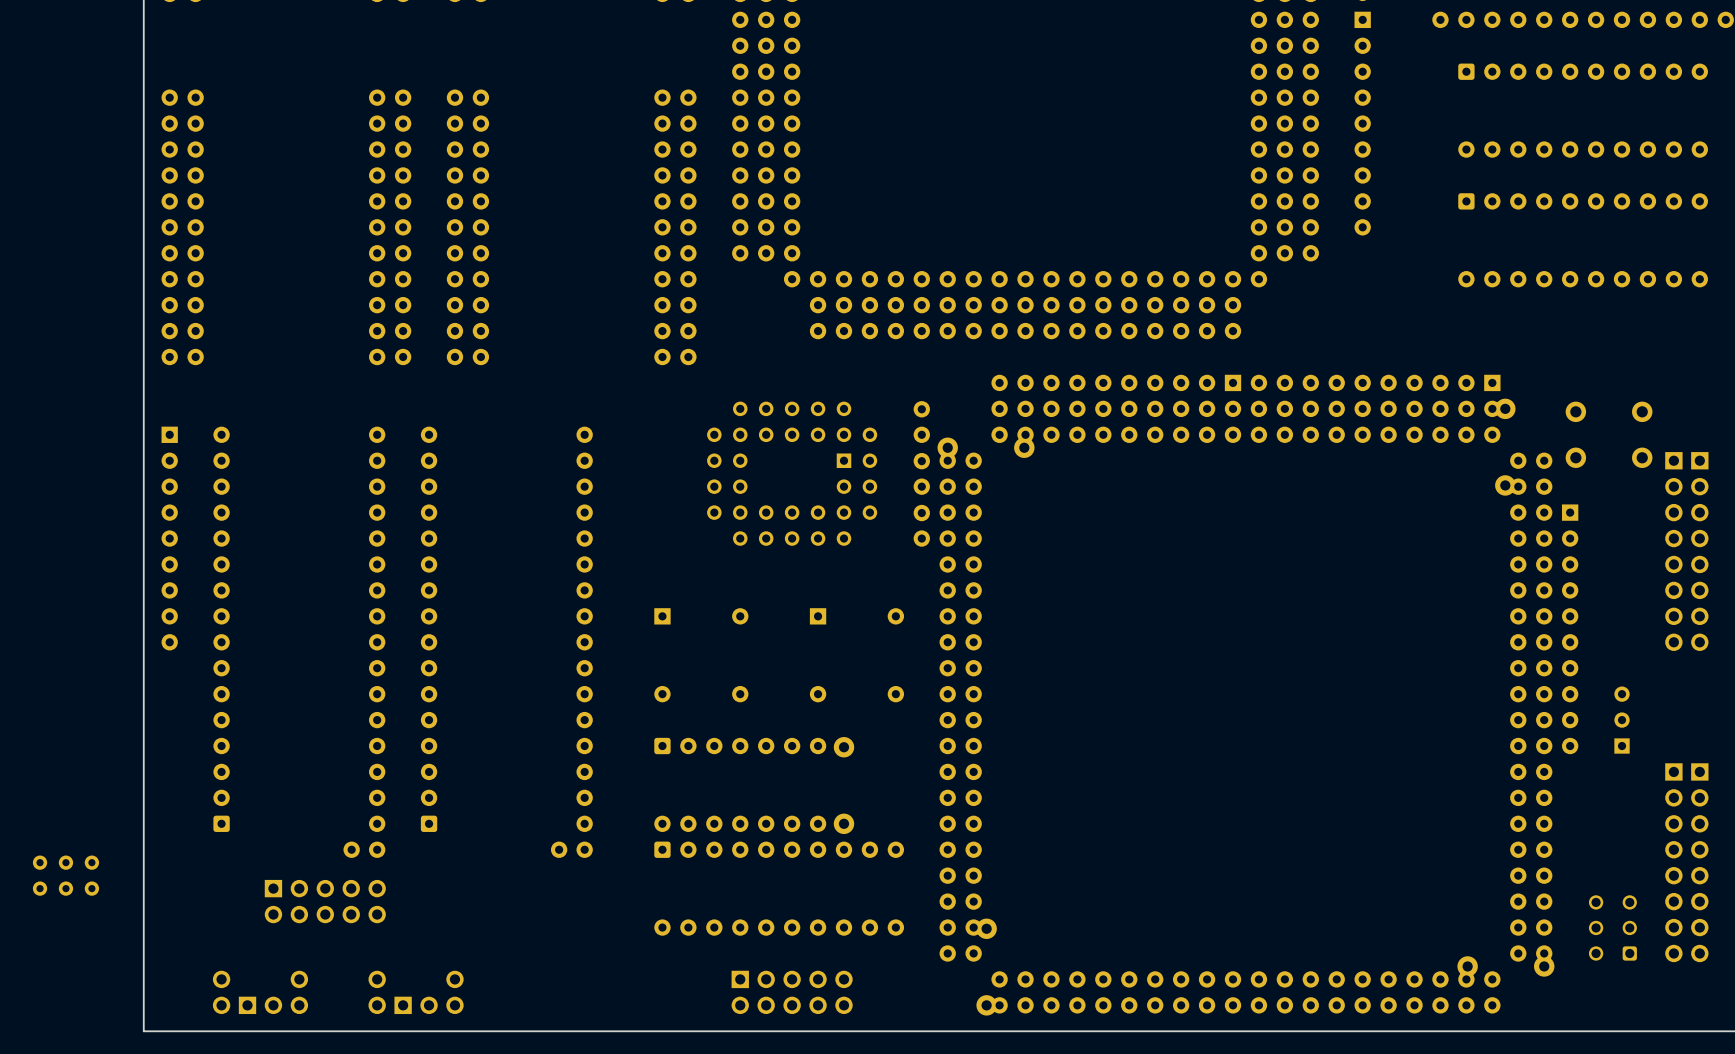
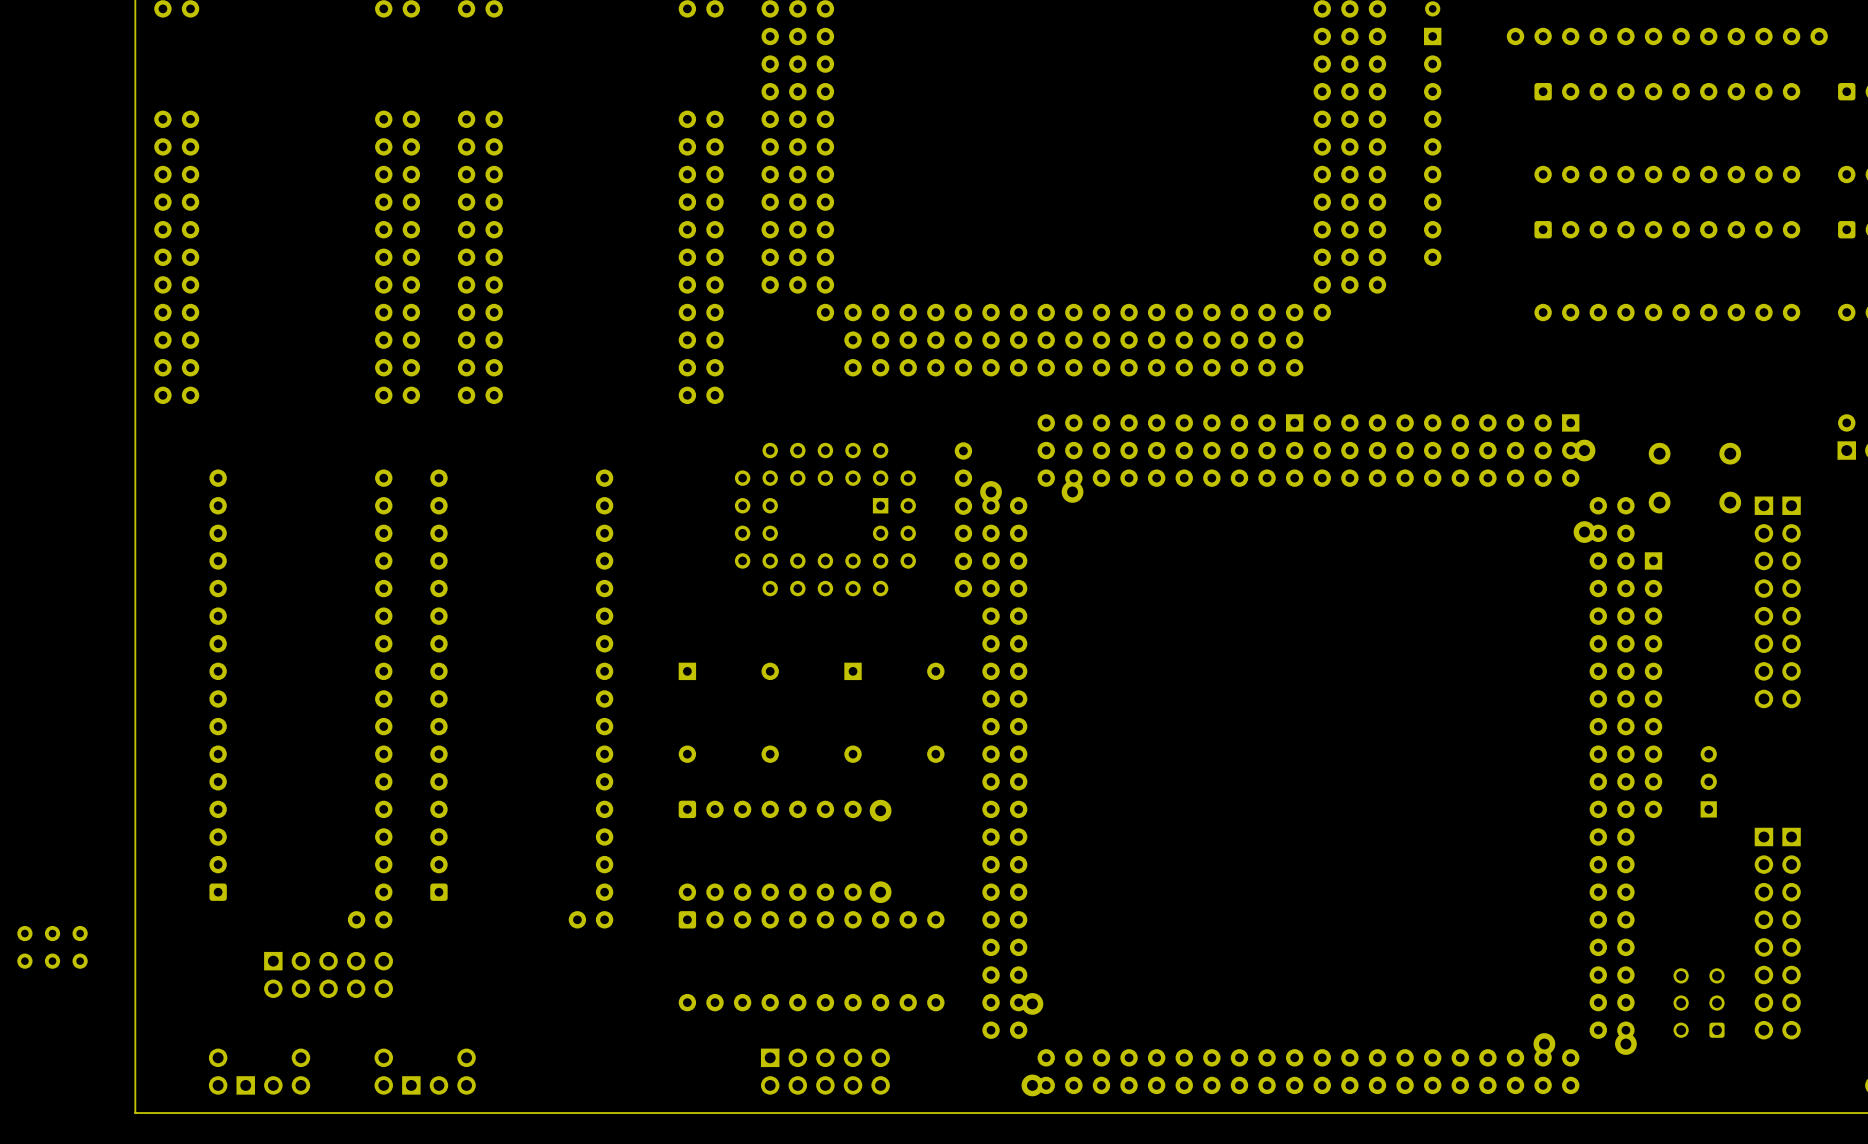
part: (169, 538) -> none

